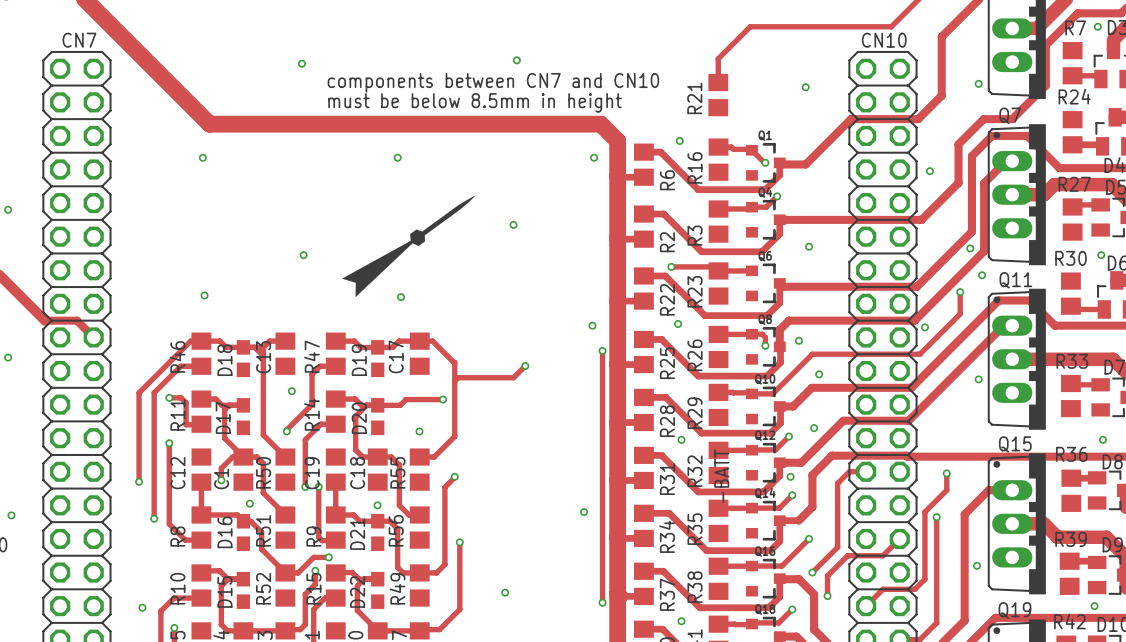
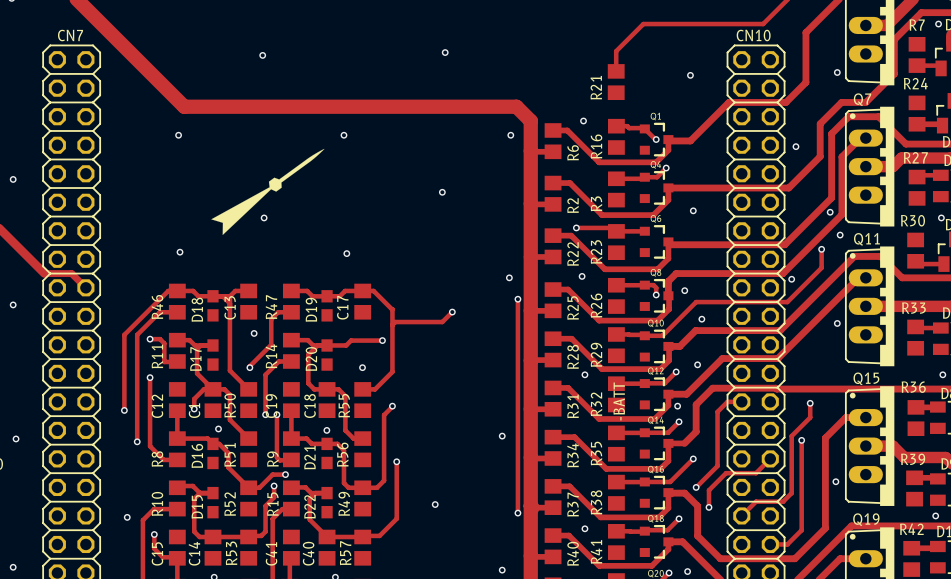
text: components between CN7 and CN10 (493, 82) -> none
text: must be below 8.5mm in height (474, 102) -> none
drawing position: (408, 246) -> (267, 191)

